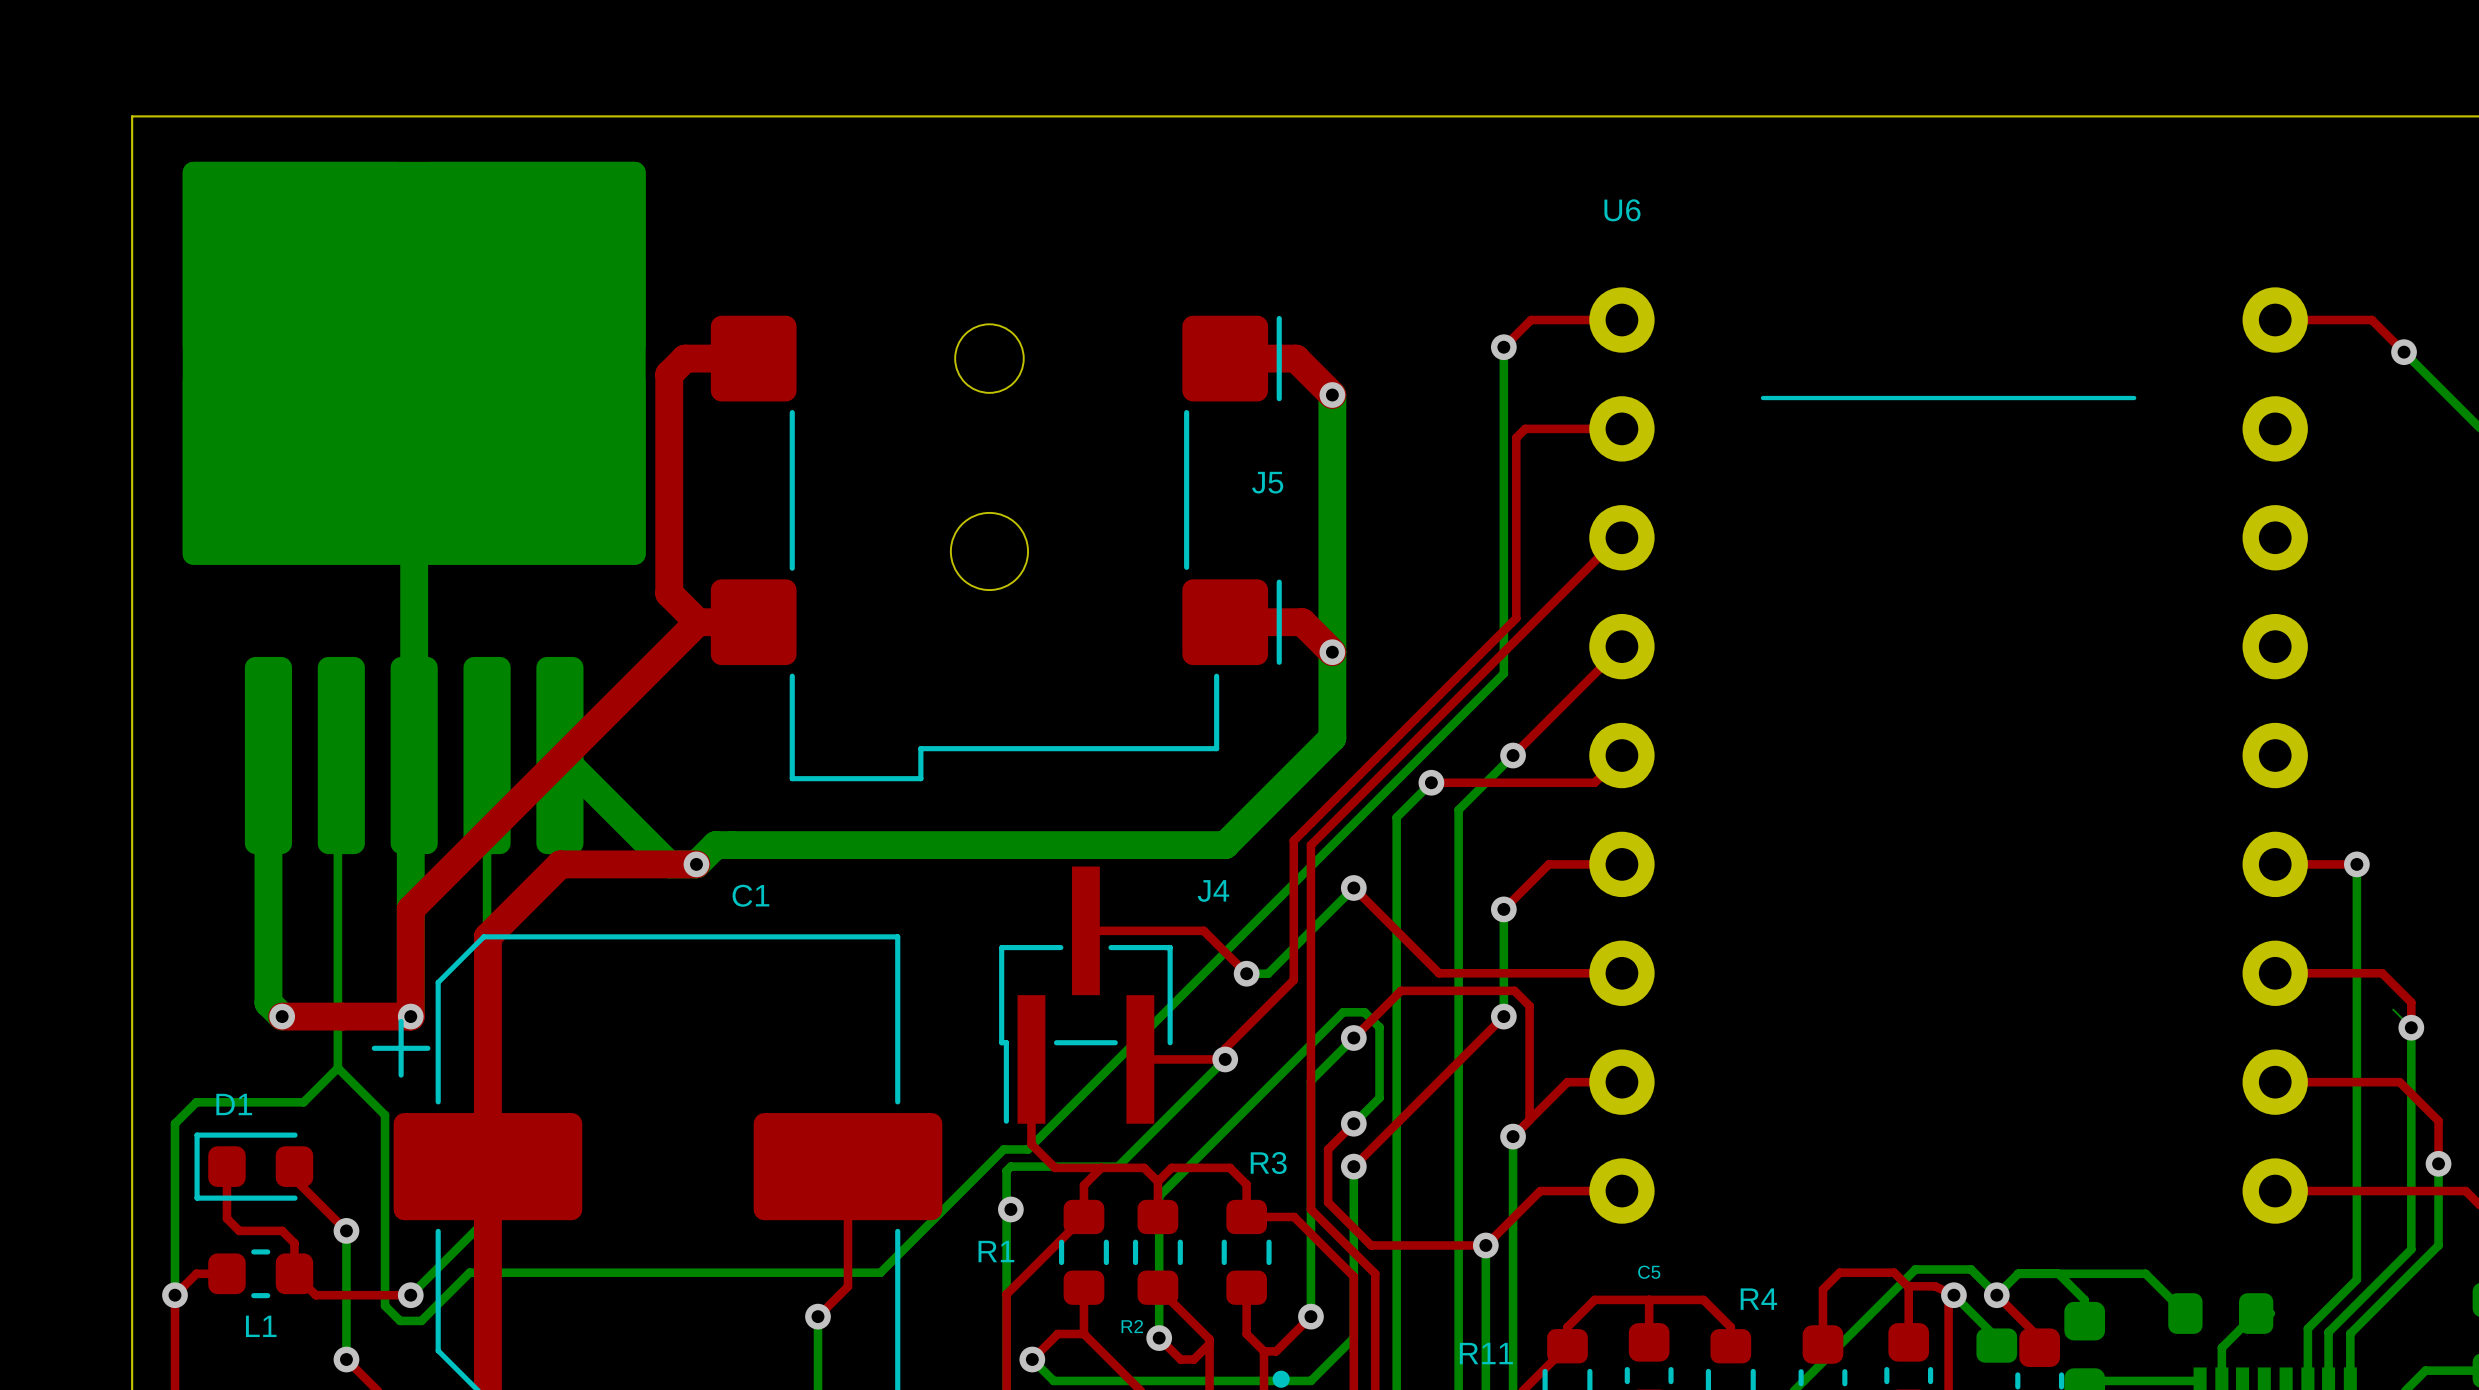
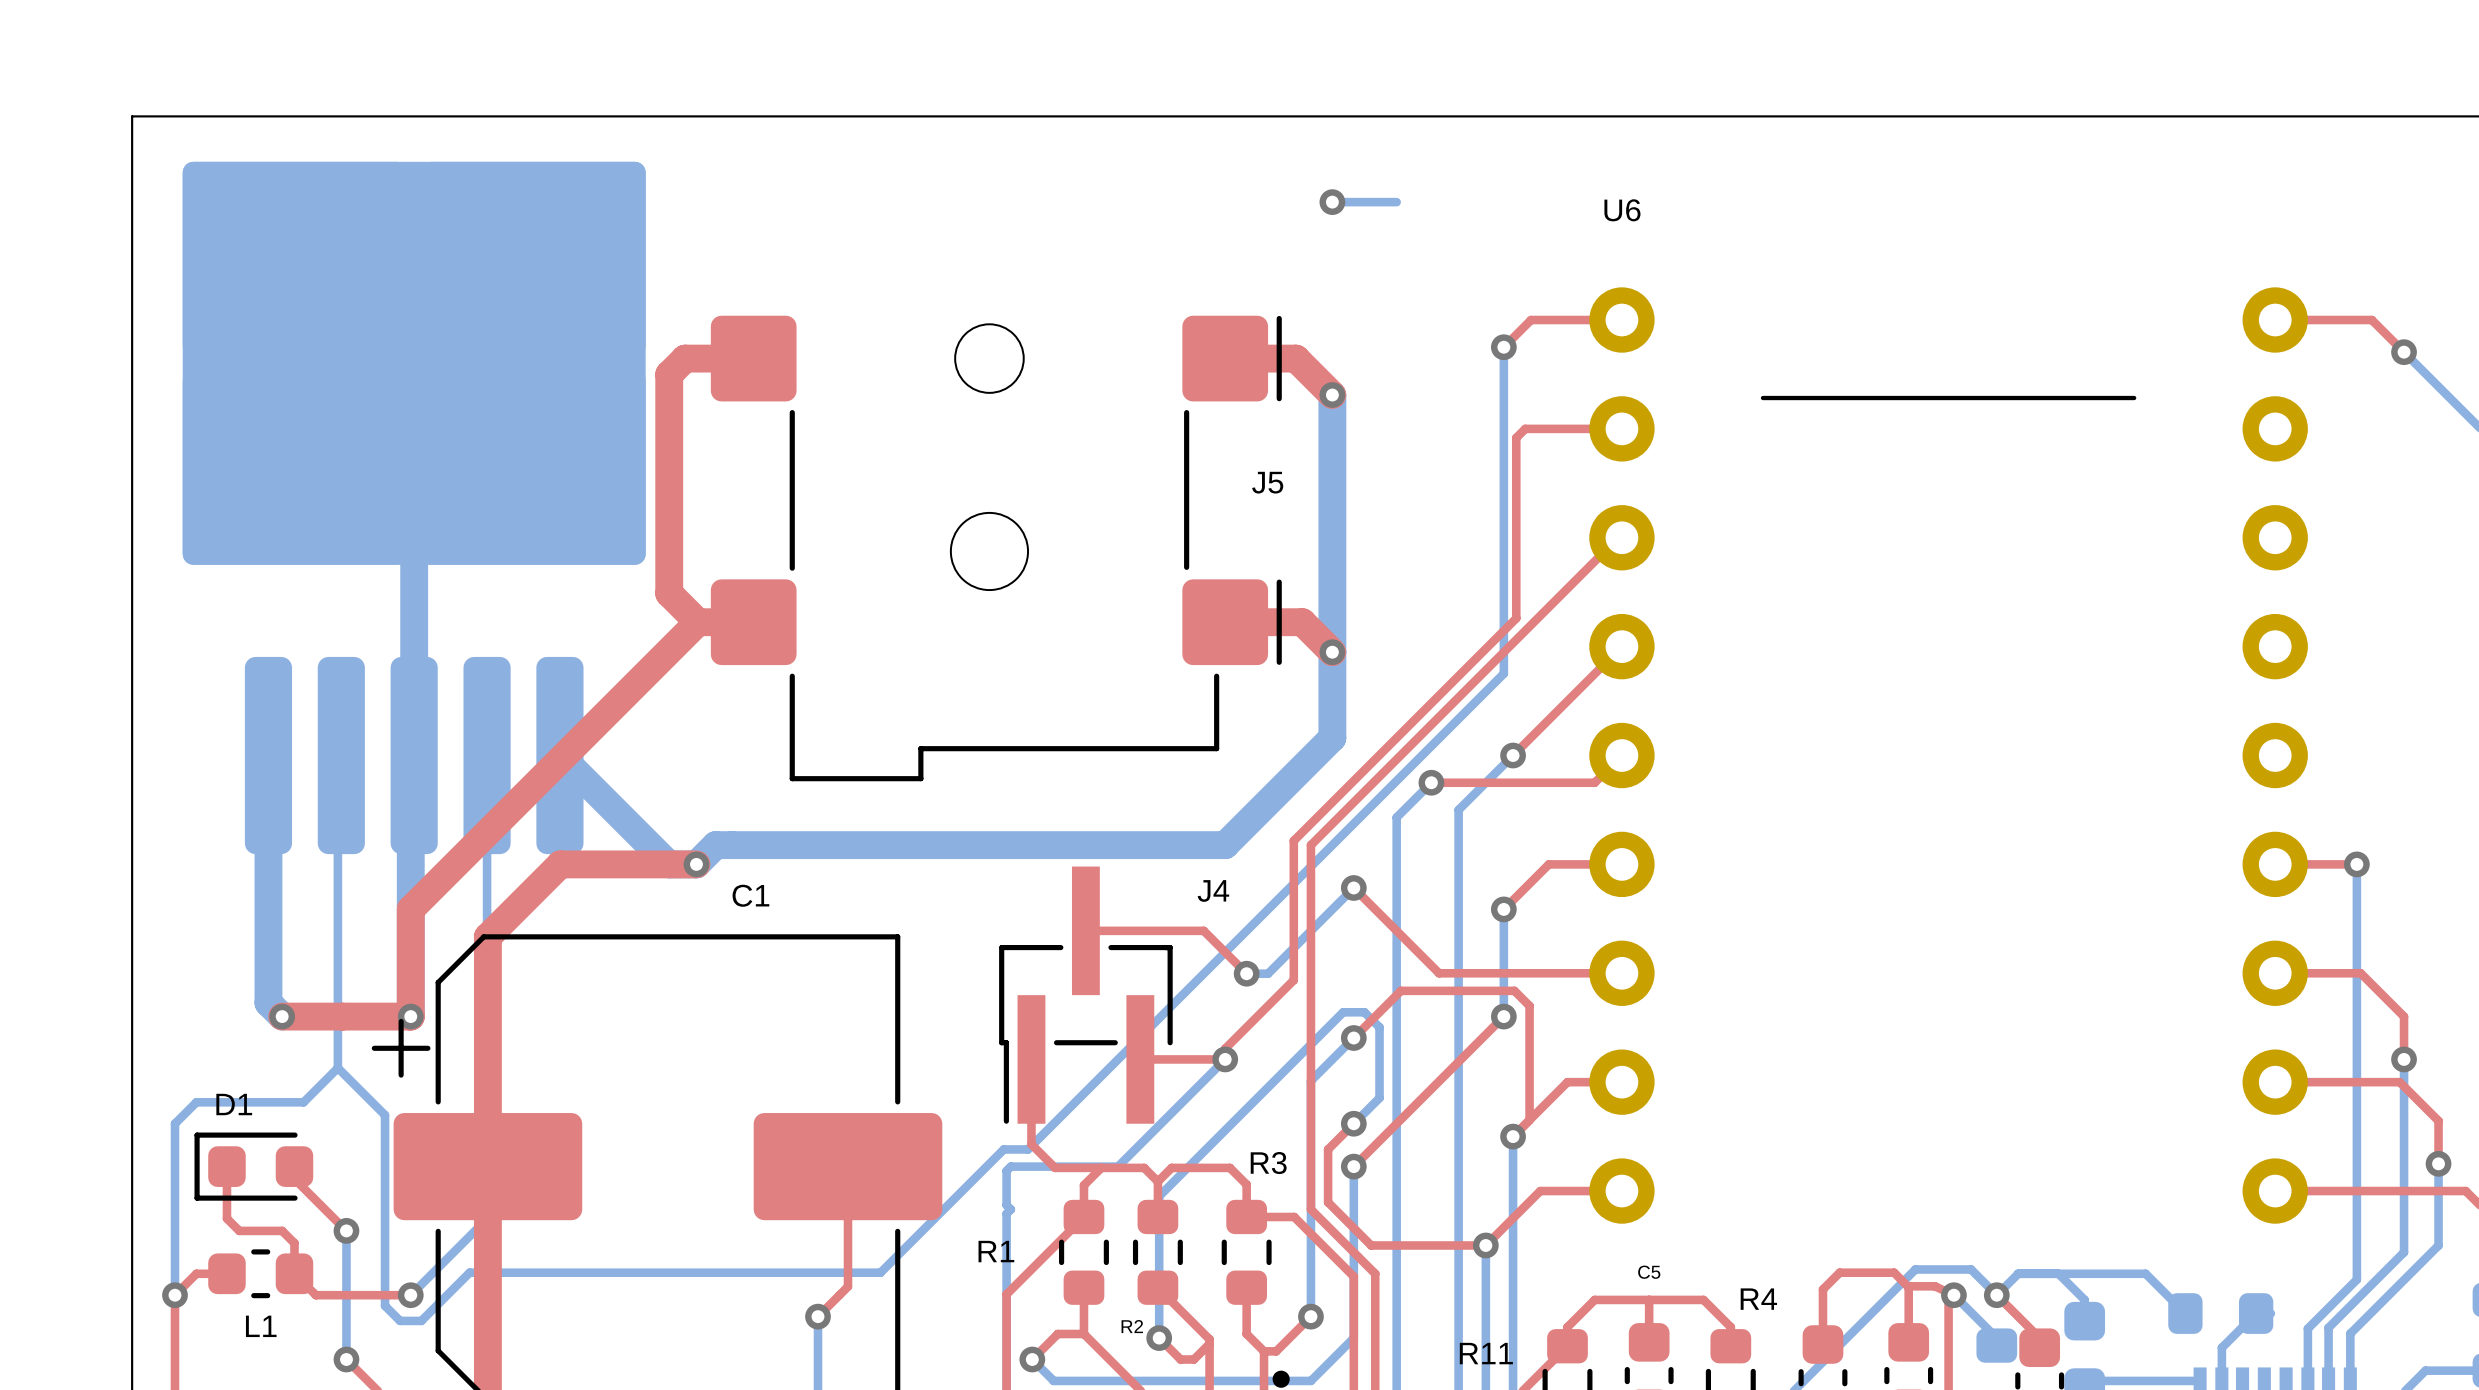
bottom track: none -> (1332, 202) (1396, 202)
via: none -> (1332, 202)
top track: (2360, 973) (2382, 973) (2411, 1002) (2411, 1027) -> (2360, 973) (2404, 1016) (2404, 1059)
bottom track: (2393, 1009) (2411, 1027) (2411, 1249) (2328, 1332) -> (2404, 1059) (2404, 1252) (2328, 1327) (2328, 1332)
via position: (2411, 1027) -> (2404, 1059)
via: (1010, 1209) -> none

